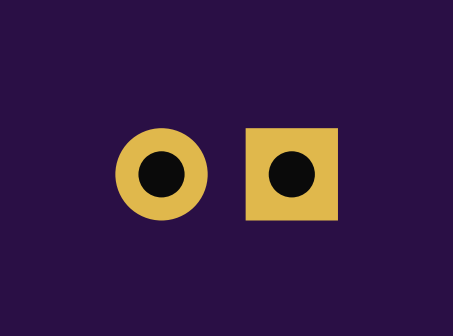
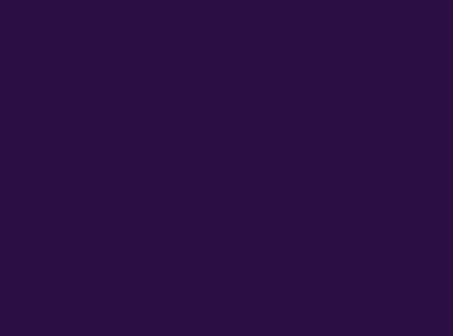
part: (226, 174) -> none

